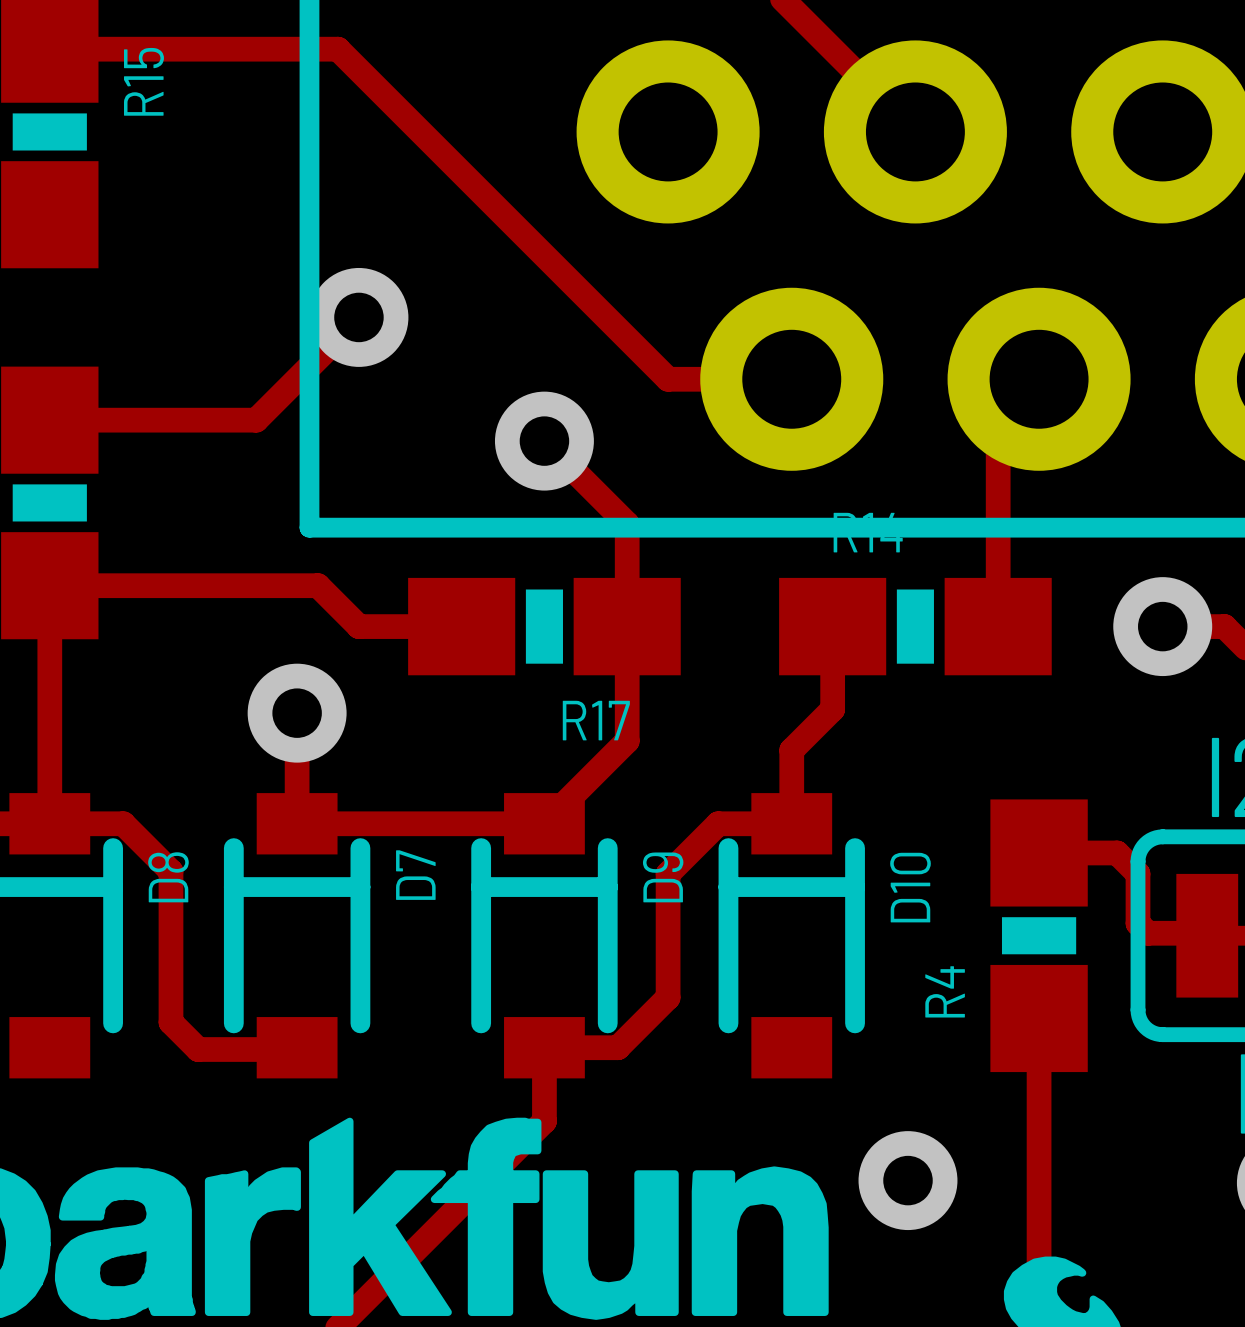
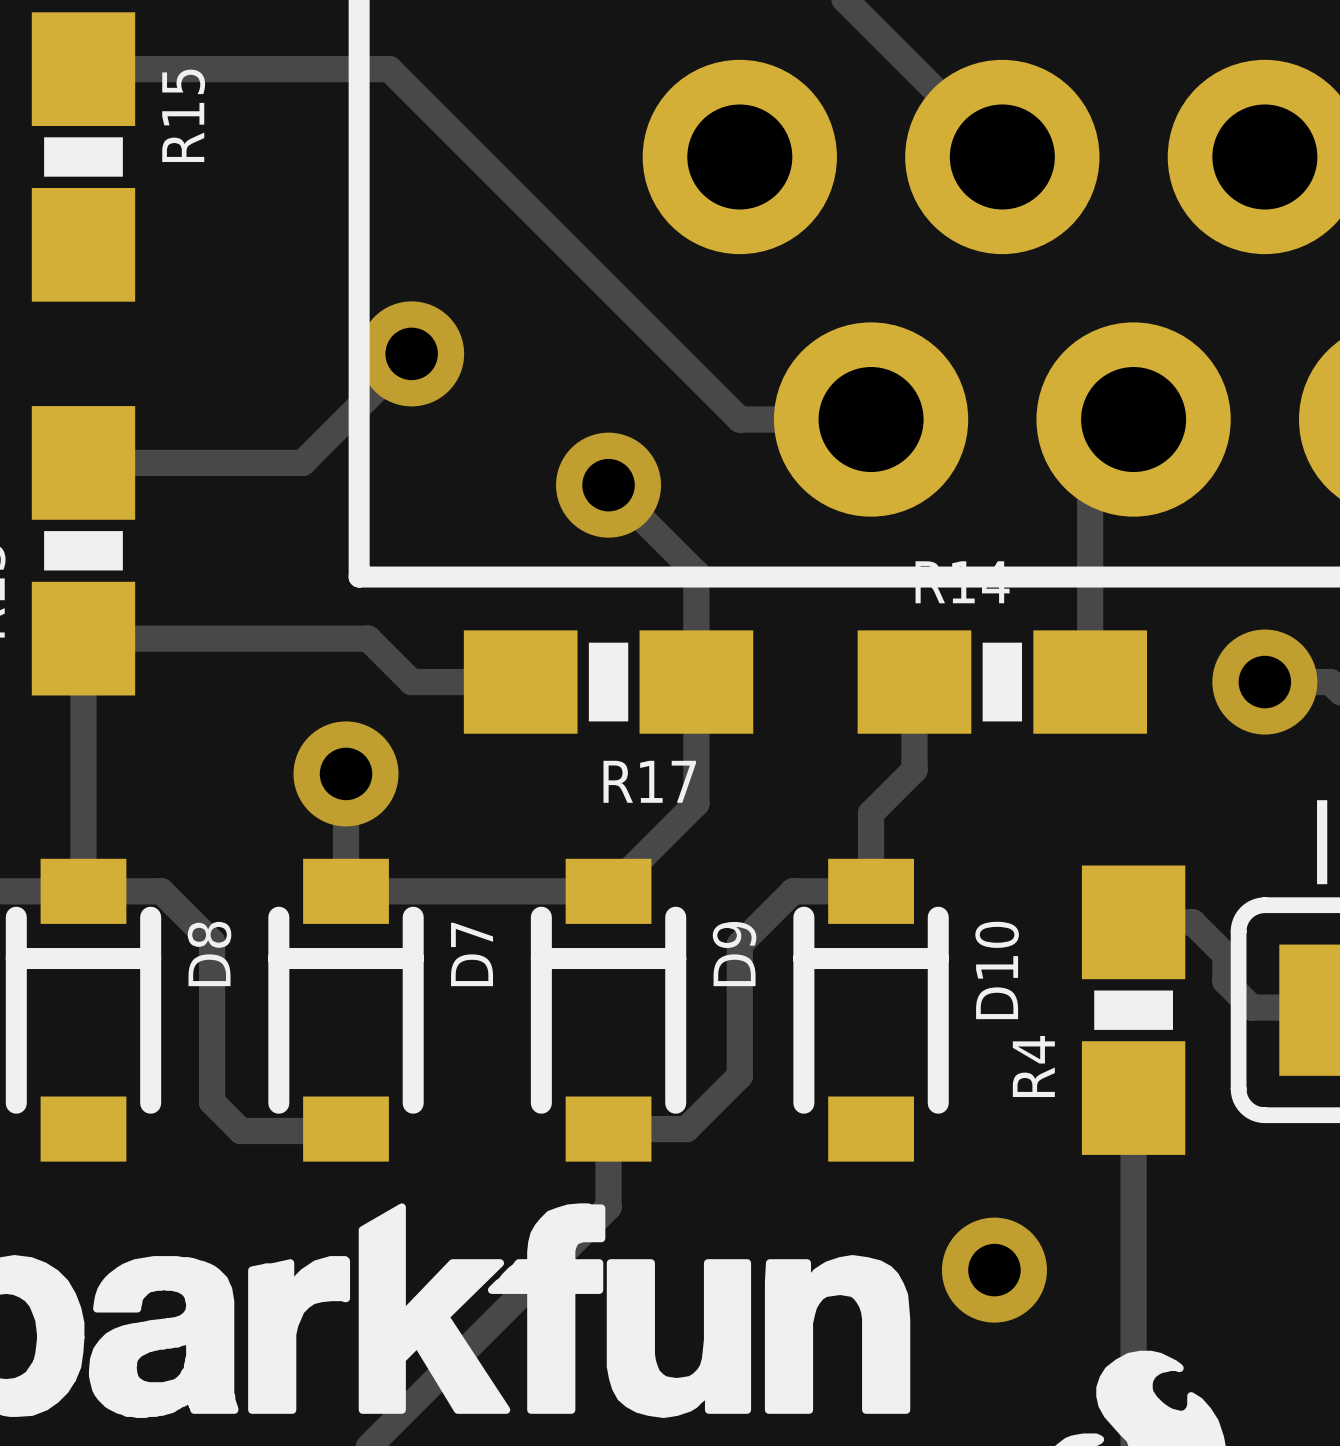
track: (1094, 852) (1117, 852) (1138, 873) (1138, 923) (1147, 933) (1150, 933) -> (1192, 922) (1225, 955) (1225, 981) (1251, 1007)

